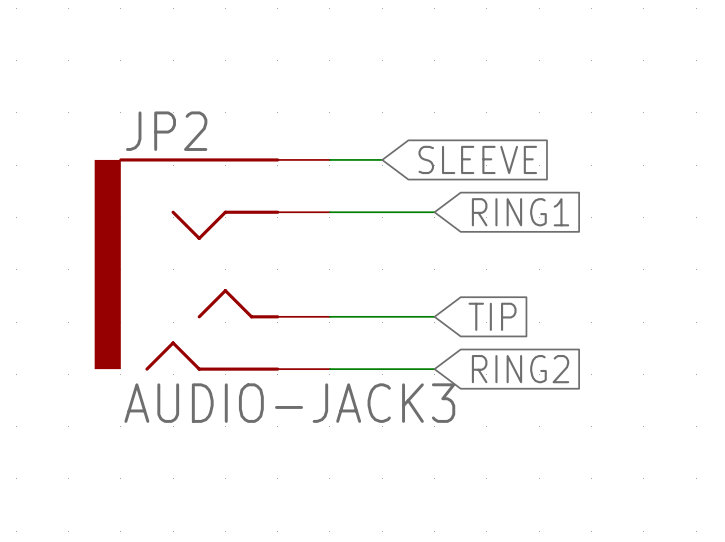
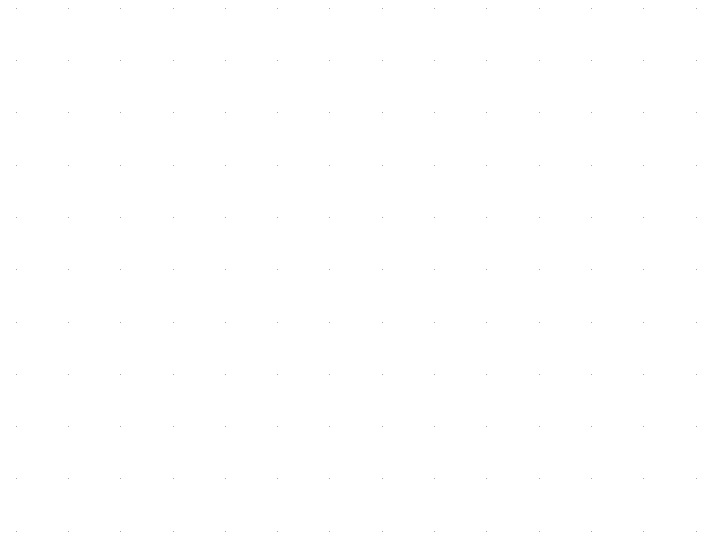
wire: (329, 159) (382, 159) -> none
global label: SLEEVE (477, 159) -> none
wire: (329, 212) (434, 212) -> none
global label: RING1 (520, 212) -> none
JP2: AUDIO-JACK3 (212, 264) -> none
wire: (329, 316) (434, 316) -> none
global label: TIP (492, 316) -> none
wire: (329, 369) (434, 369) -> none
global label: RING2 (520, 369) -> none

